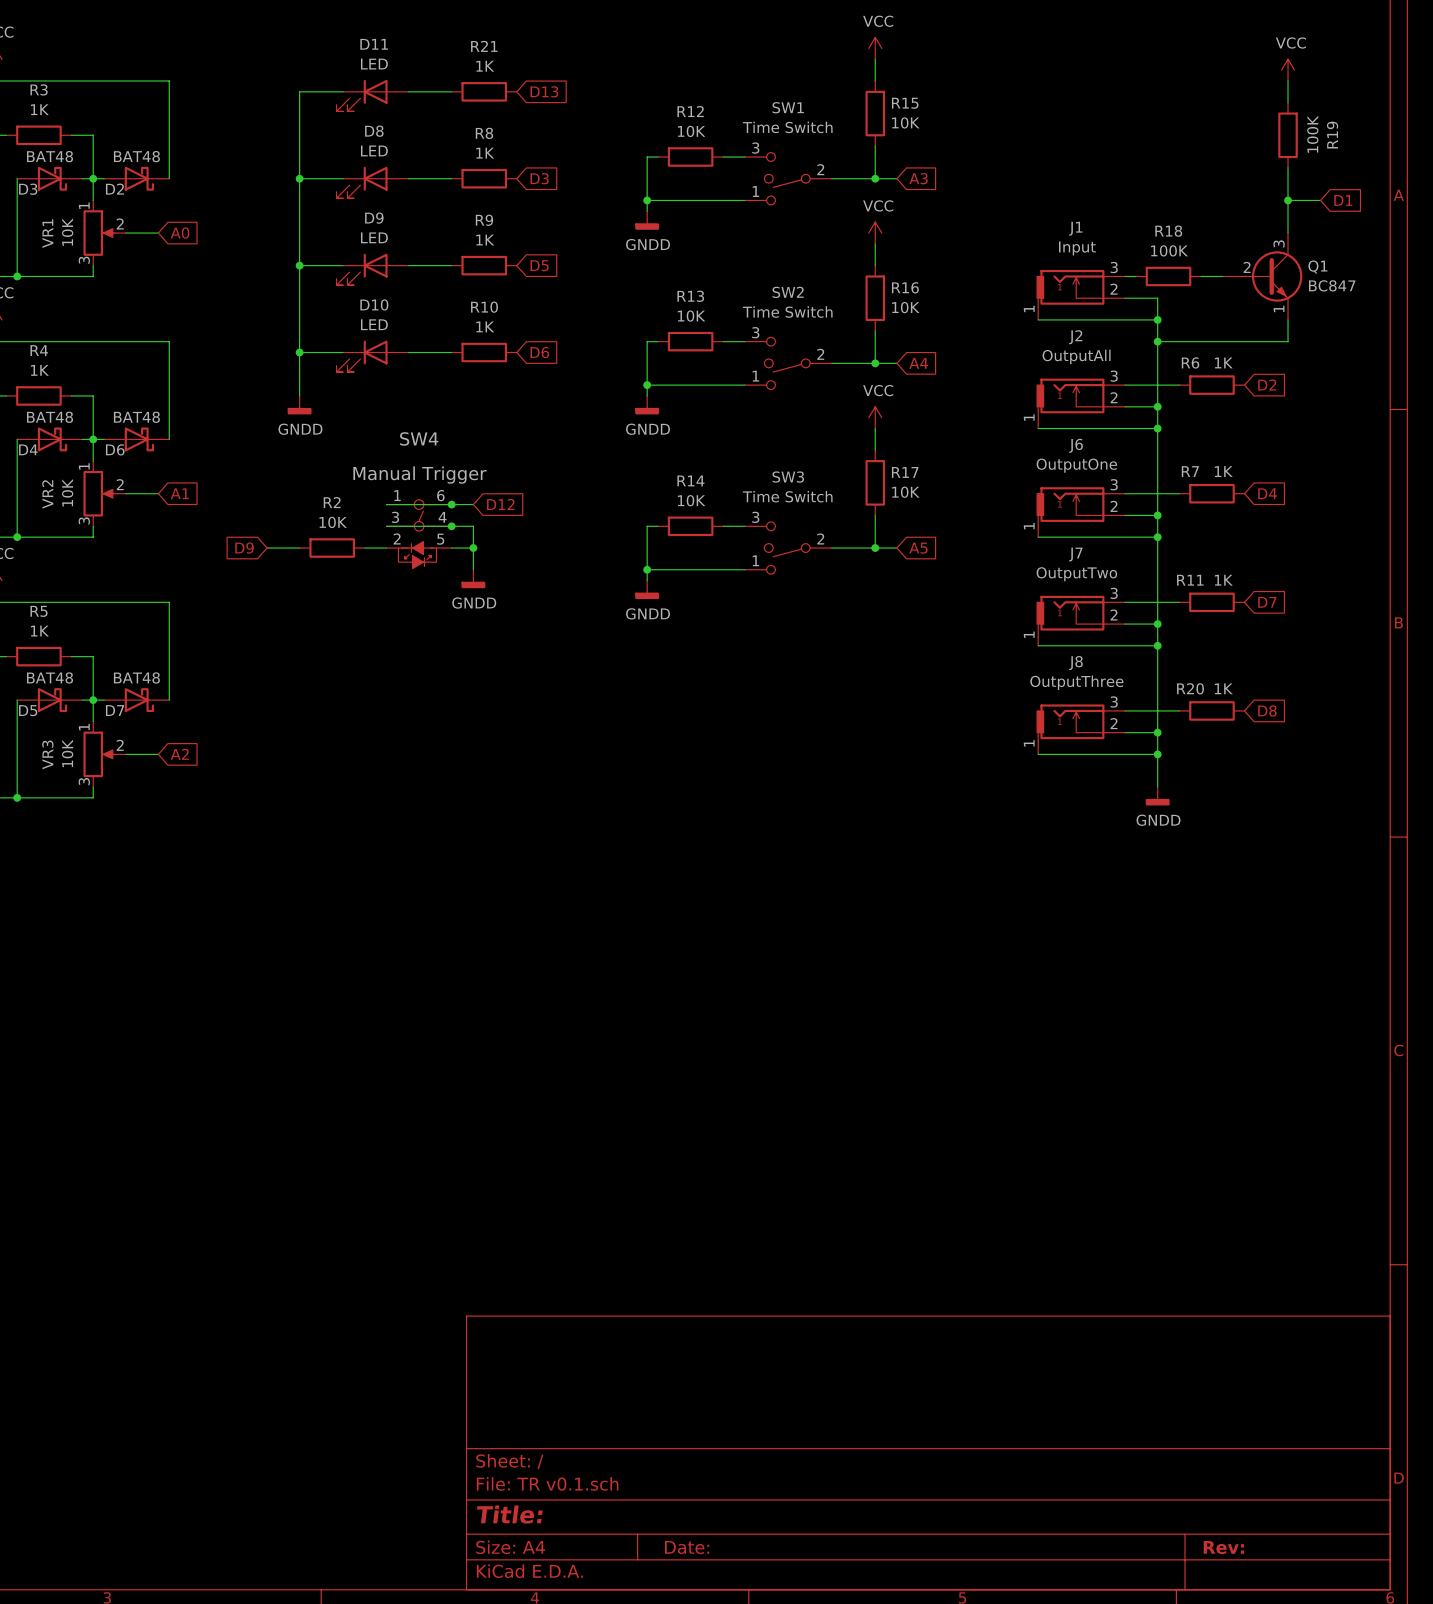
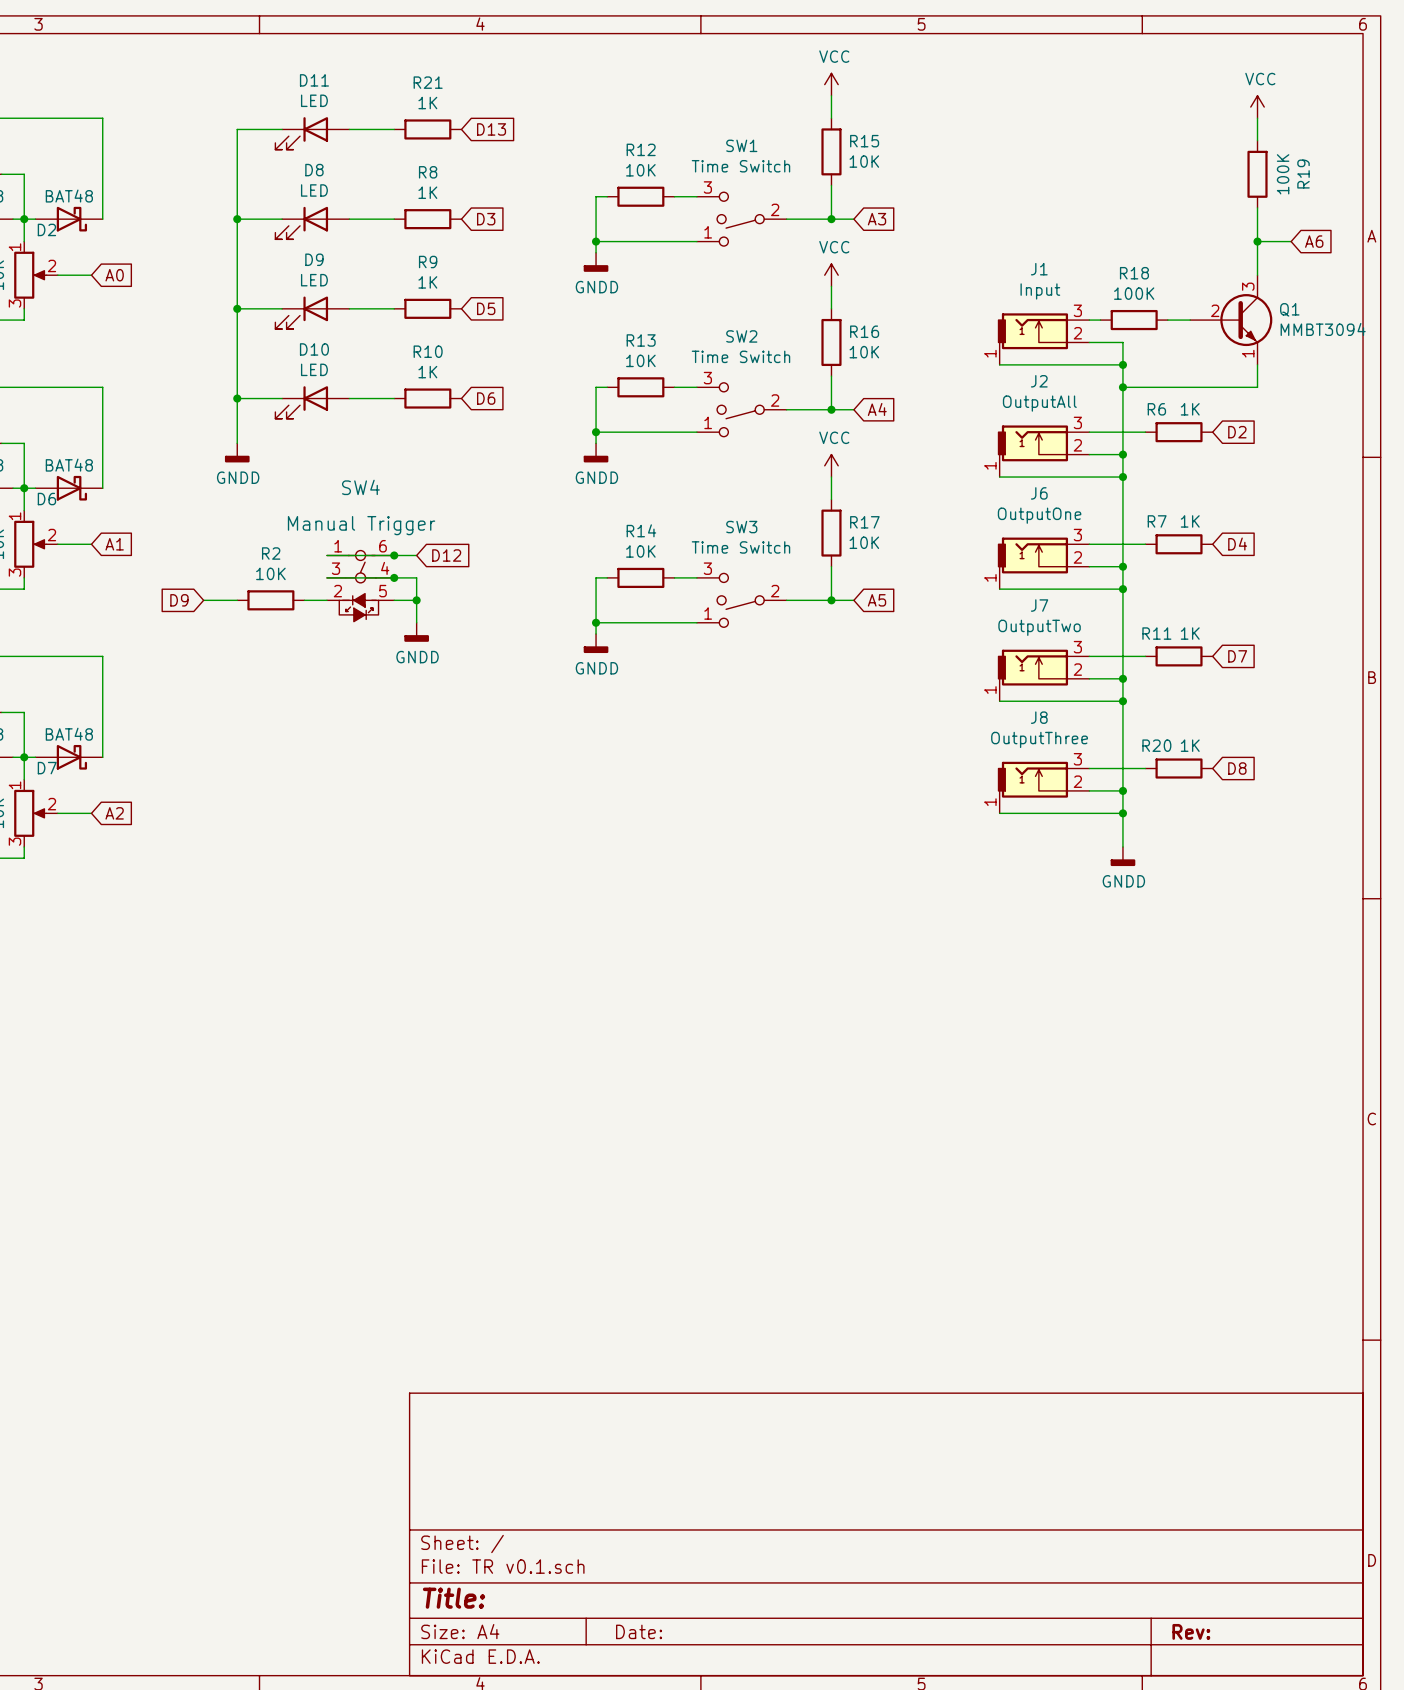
global label: D1 (1343, 200) -> A6 (1314, 241)
Q1 value: BC847 (1332, 285) -> MMBT3094 (1323, 329)

